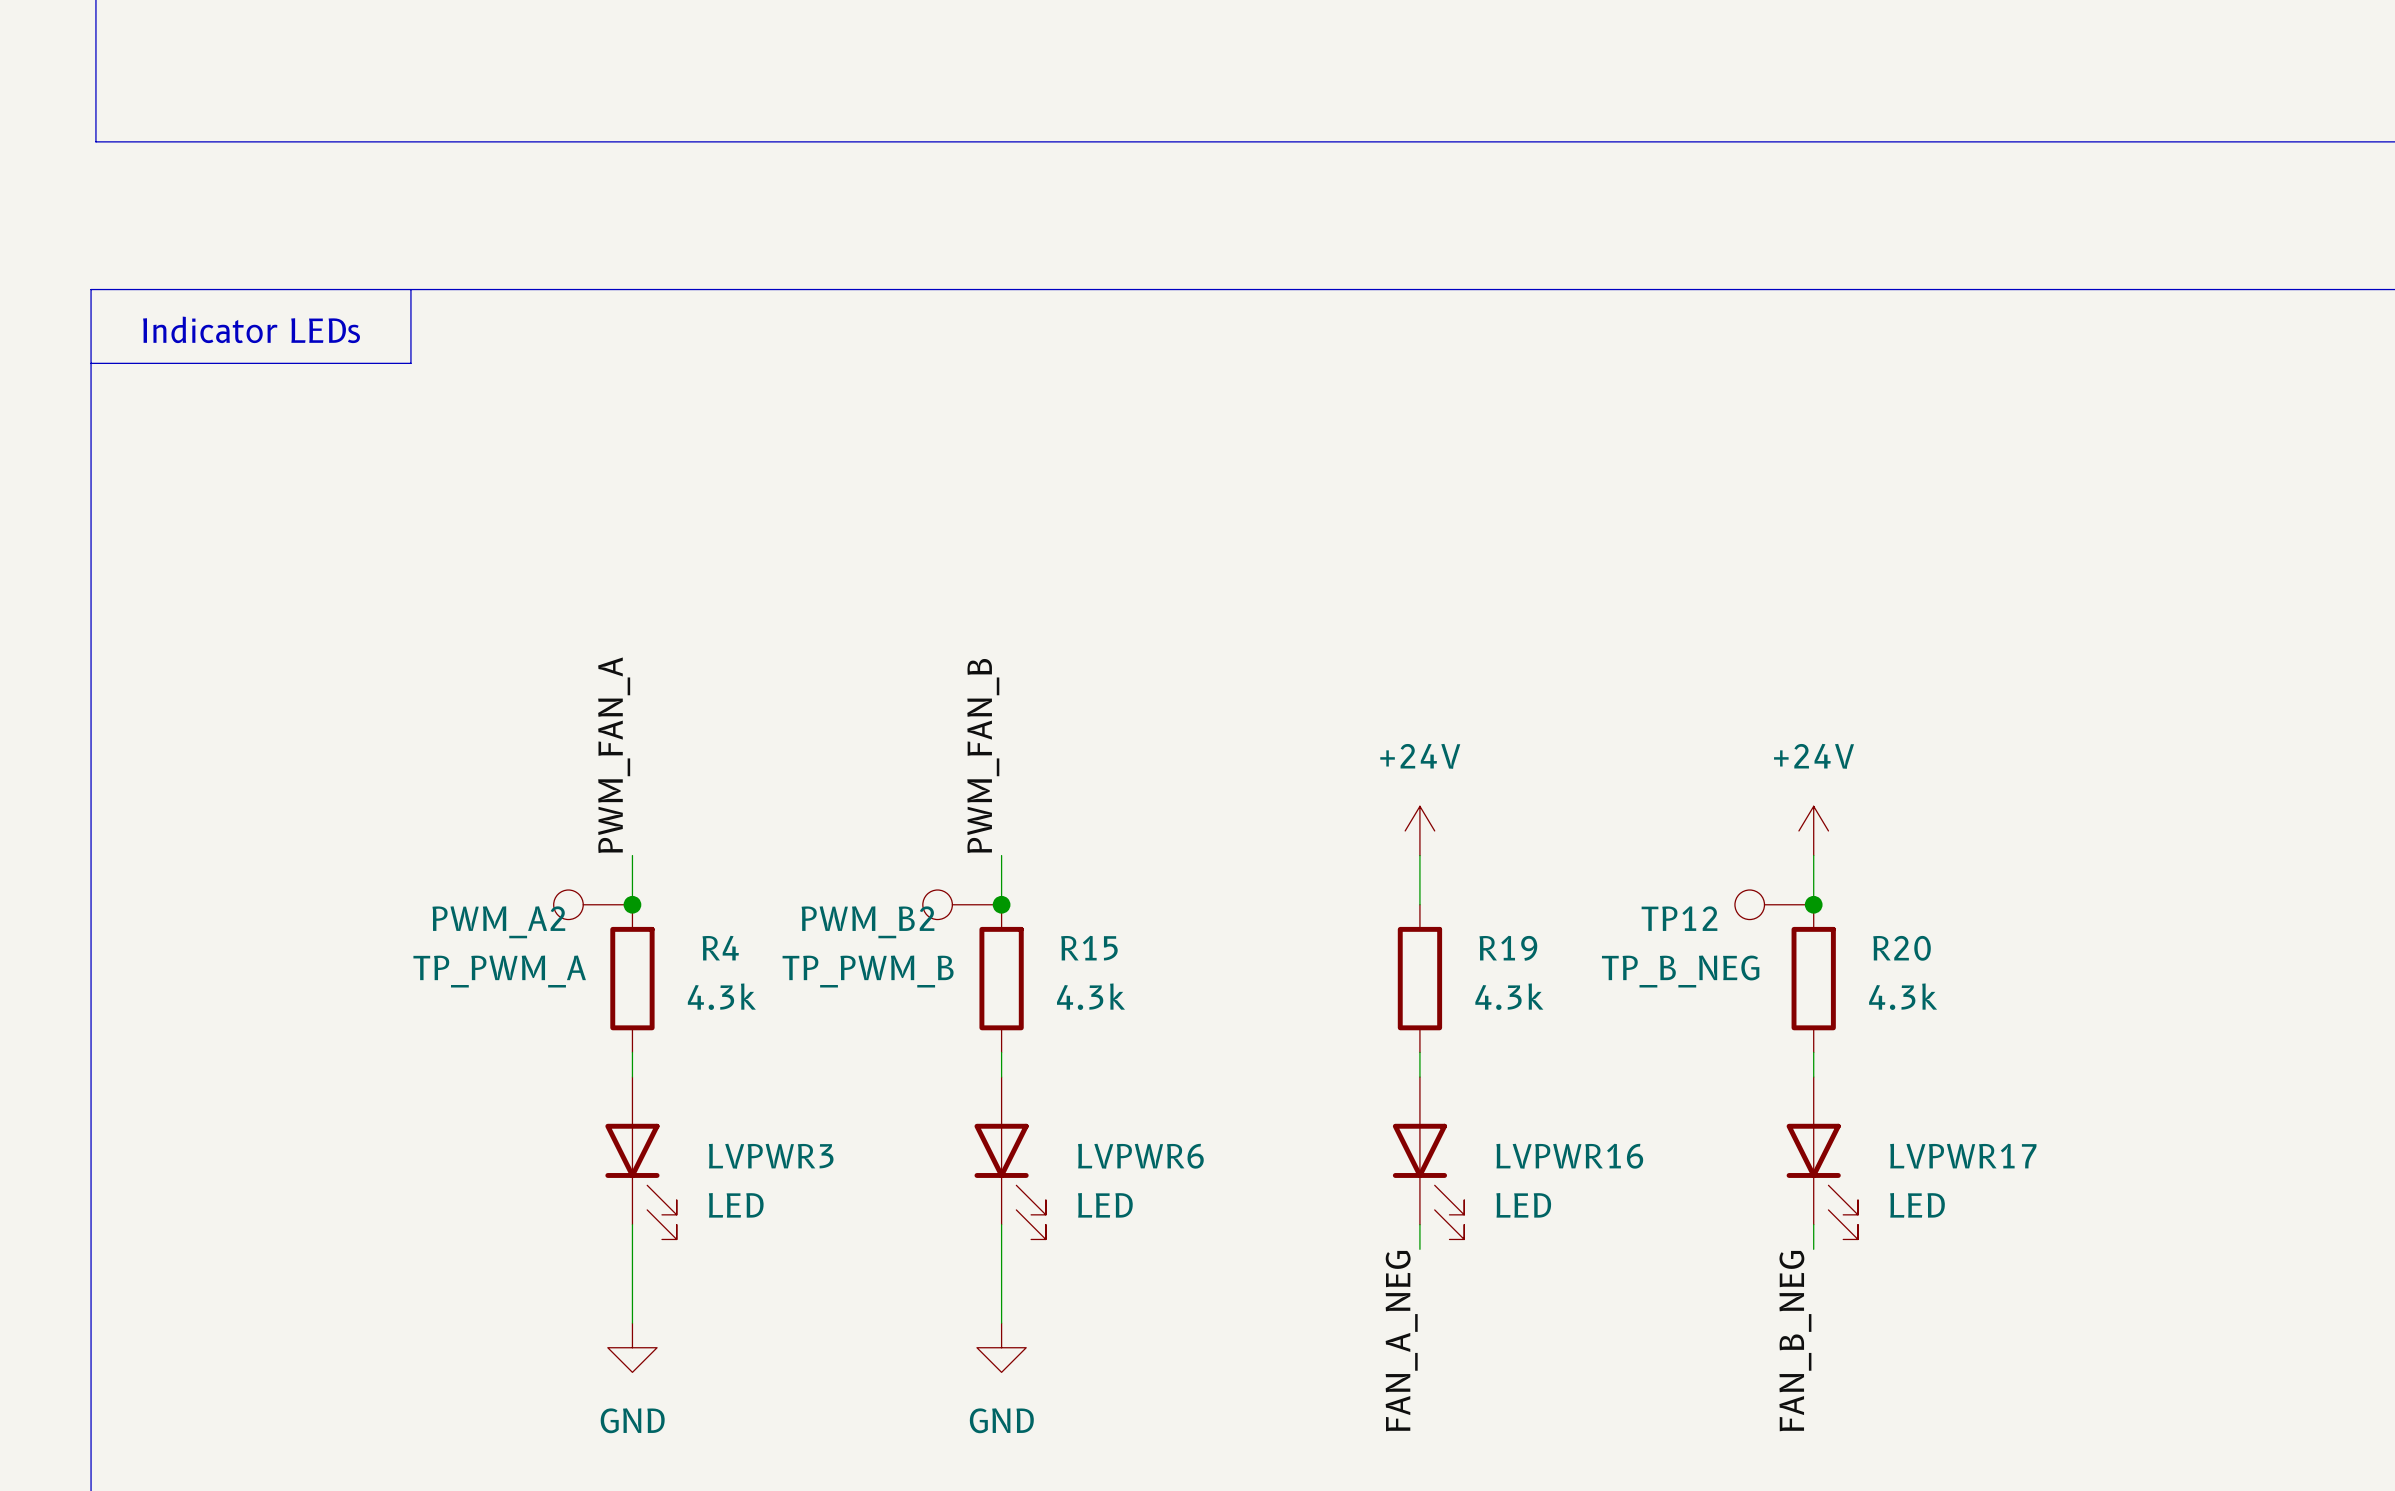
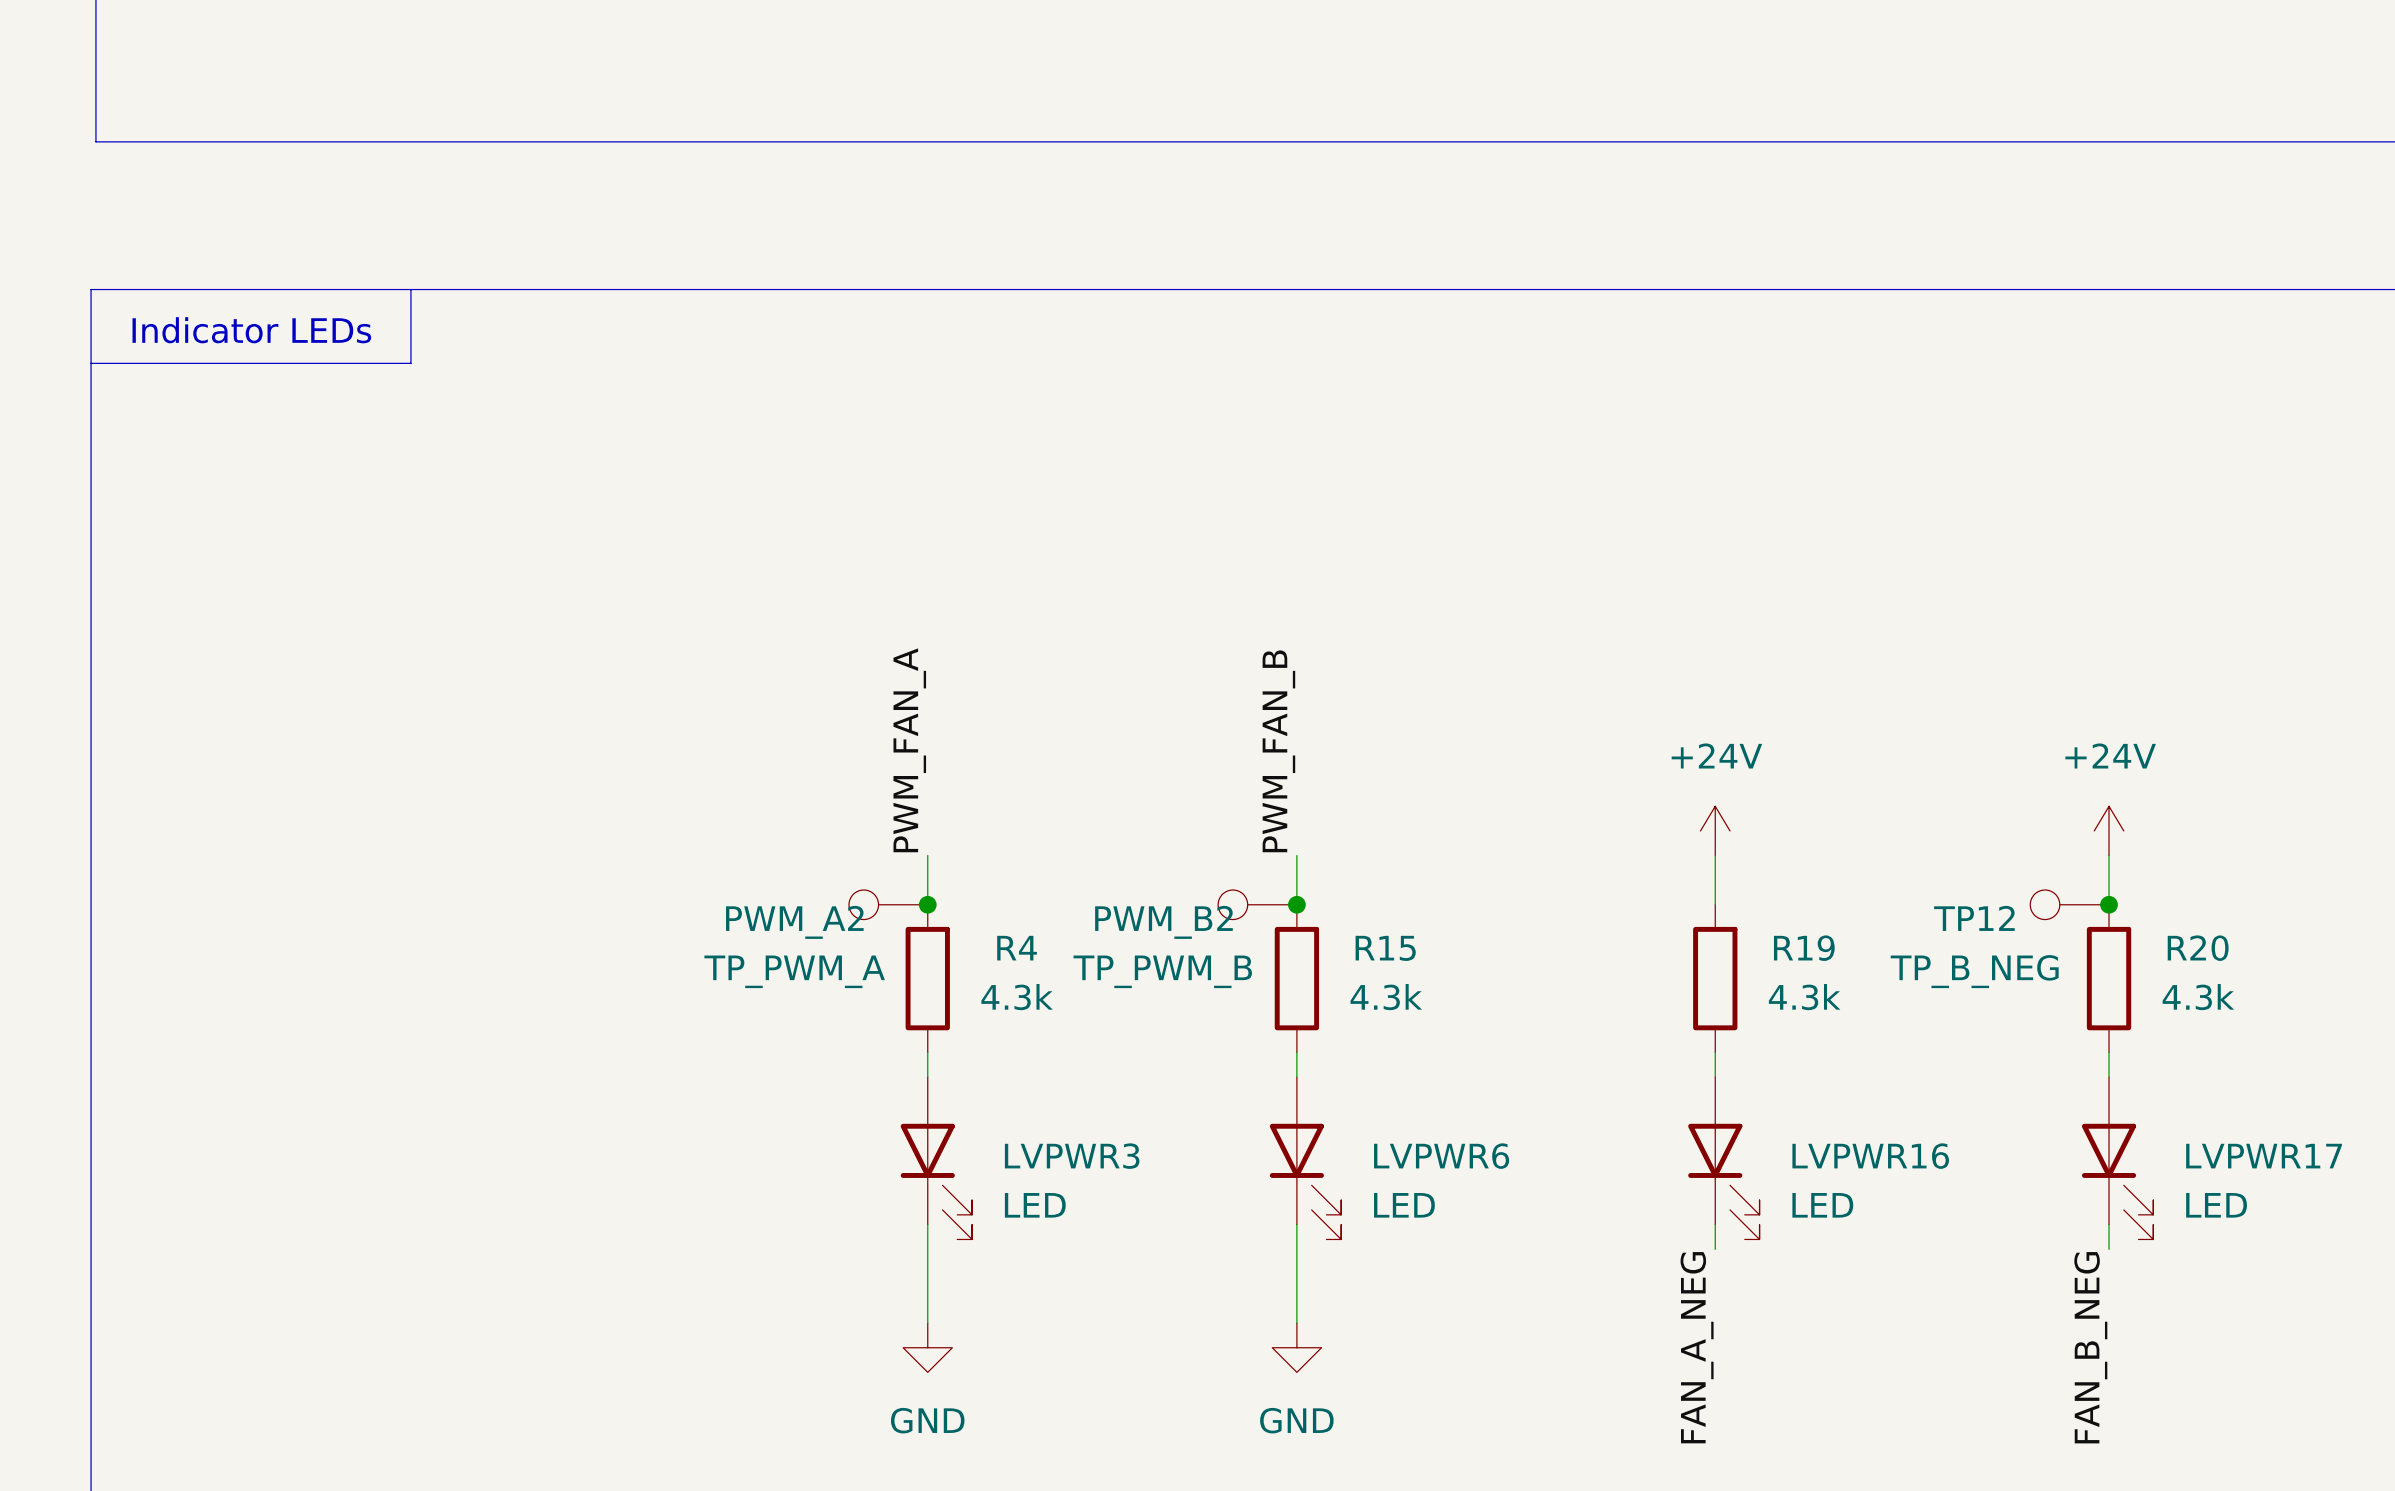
label position: PWM_FAN_A (614, 755) -> PWM_FAN_A (909, 750)
label position: PWM_FAN_B (983, 756) -> PWM_FAN_B (1278, 751)
power symbol: +24V (1419, 830) -> none
power symbol position: +24V (1813, 830) -> +24V (1715, 830)
power symbol: none -> +24V (2109, 830)
wire: (632, 855) (632, 904) -> (927, 855) (927, 904)
wire: (1001, 855) (1001, 904) -> (1296, 855) (1296, 904)
wire: (1419, 855) (1419, 904) -> (1715, 855) (1715, 904)
wire: (1813, 855) (1813, 904) -> (2109, 855) (2109, 904)
PWM_A2 position: (593, 904) -> (888, 904)
junction: (632, 904) -> none
PWM_B2 position: (962, 904) -> (1257, 904)
junction position: (1001, 904) -> (927, 904)
junction: none -> (1296, 904)
TP12 position: (1774, 904) -> (2069, 904)
junction: (1813, 904) -> none
junction: none -> (2109, 904)
R4 position: (632, 978) -> (927, 978)
R15 position: (1001, 978) -> (1296, 978)
R19 position: (1419, 978) -> (1715, 978)
R20 position: (1813, 978) -> (2109, 978)
wire: (632, 1052) (632, 1077) -> (927, 1052) (927, 1077)
wire: (1001, 1052) (1001, 1077) -> (1296, 1052) (1296, 1077)
wire: (1419, 1052) (1419, 1077) -> (1715, 1052) (1715, 1077)
wire: (1813, 1052) (1813, 1077) -> (2109, 1052) (2109, 1077)
LVPWR3 position: (641, 1158) -> (936, 1158)
LVPWR6 position: (1010, 1158) -> (1305, 1158)
LVPWR16 position: (1428, 1158) -> (1723, 1158)
LVPWR17 position: (1822, 1158) -> (2117, 1158)
wire: (632, 1224) (632, 1323) -> (927, 1224) (927, 1323)
wire: (1001, 1224) (1001, 1323) -> (1296, 1224) (1296, 1323)
wire: (1419, 1224) (1419, 1249) -> (1715, 1224) (1715, 1249)
wire: (1813, 1224) (1813, 1249) -> (2109, 1224) (2109, 1249)
label position: FAN_A_NEG (1401, 1341) -> FAN_A_NEG (1697, 1347)
label position: FAN_B_NEG (1795, 1341) -> FAN_B_NEG (2090, 1347)
power symbol: GND (632, 1347) -> none
power symbol position: GND (1001, 1347) -> GND (927, 1347)
power symbol: none -> GND (1296, 1347)

